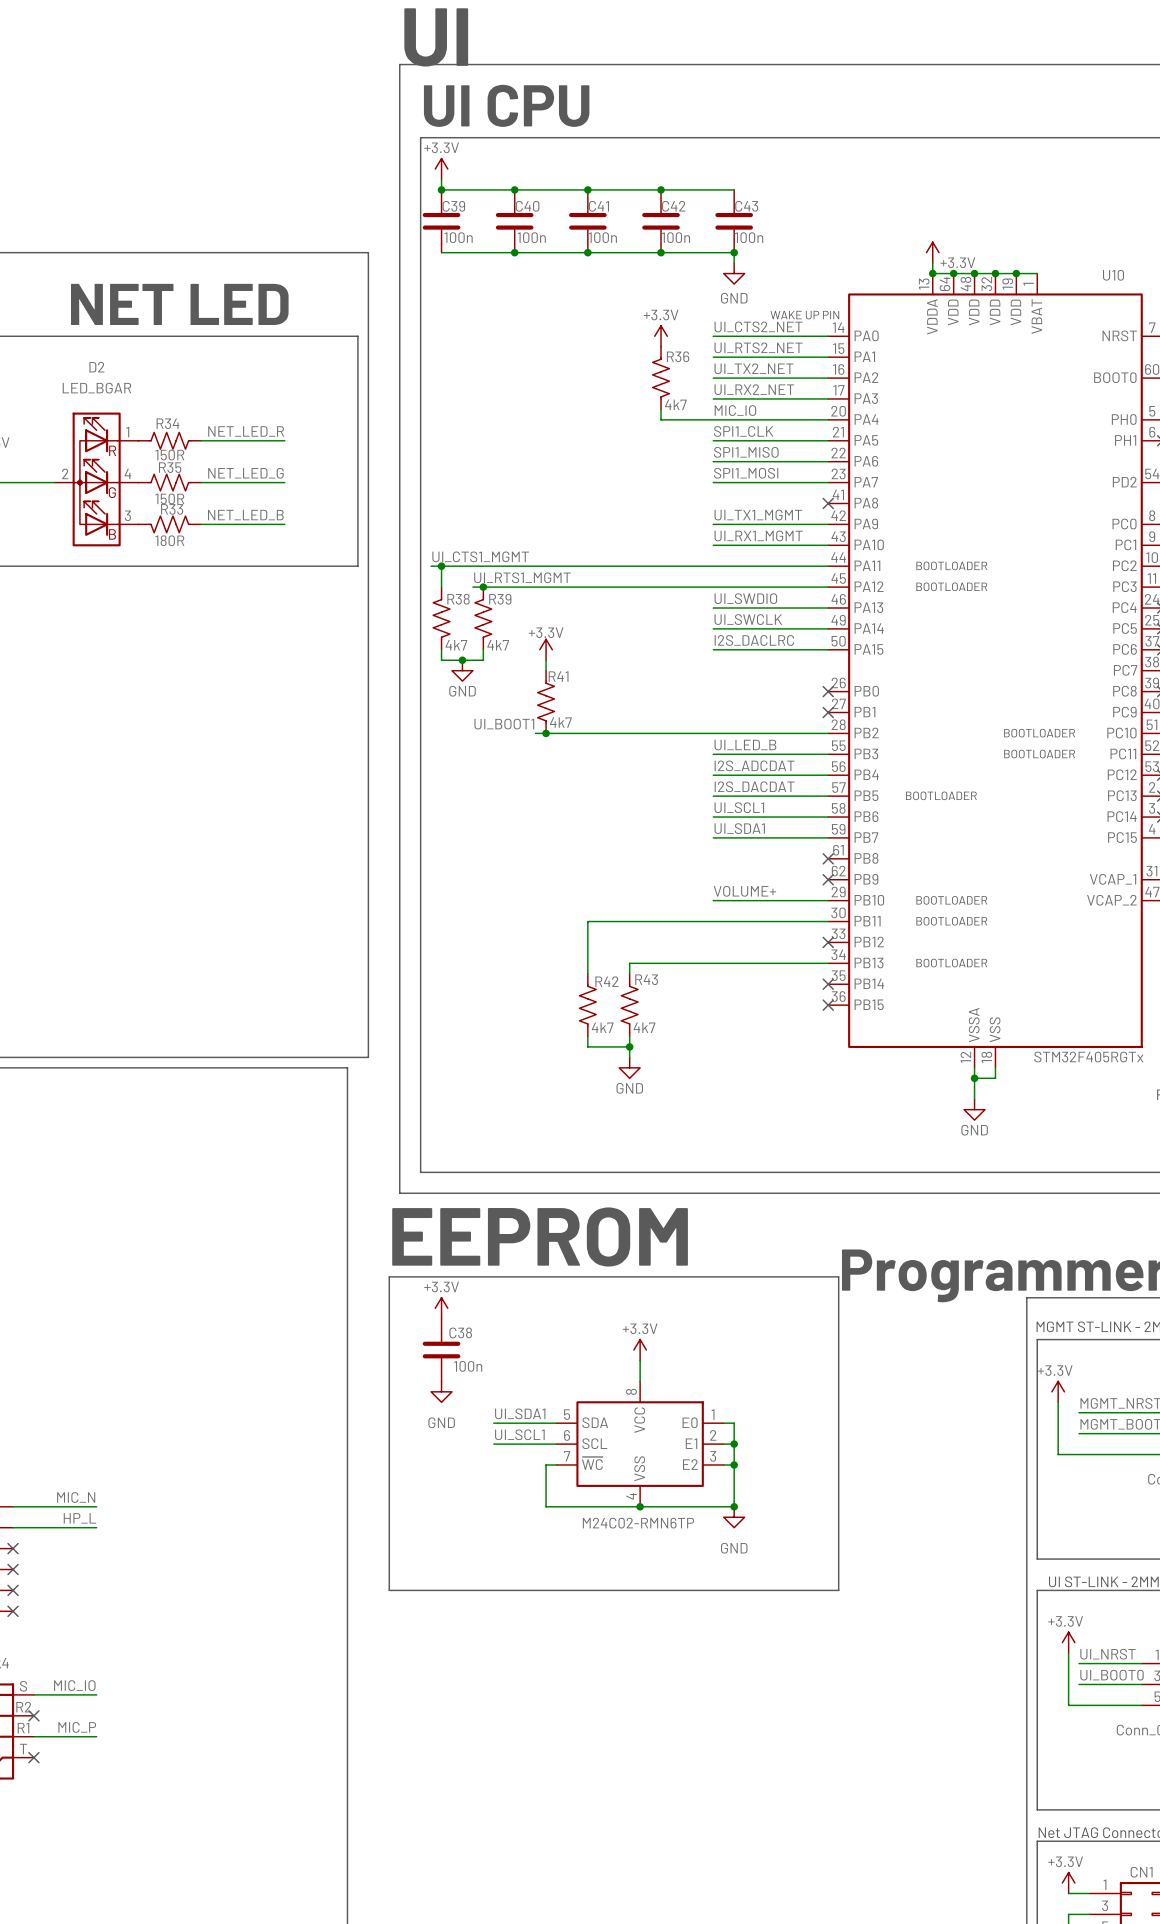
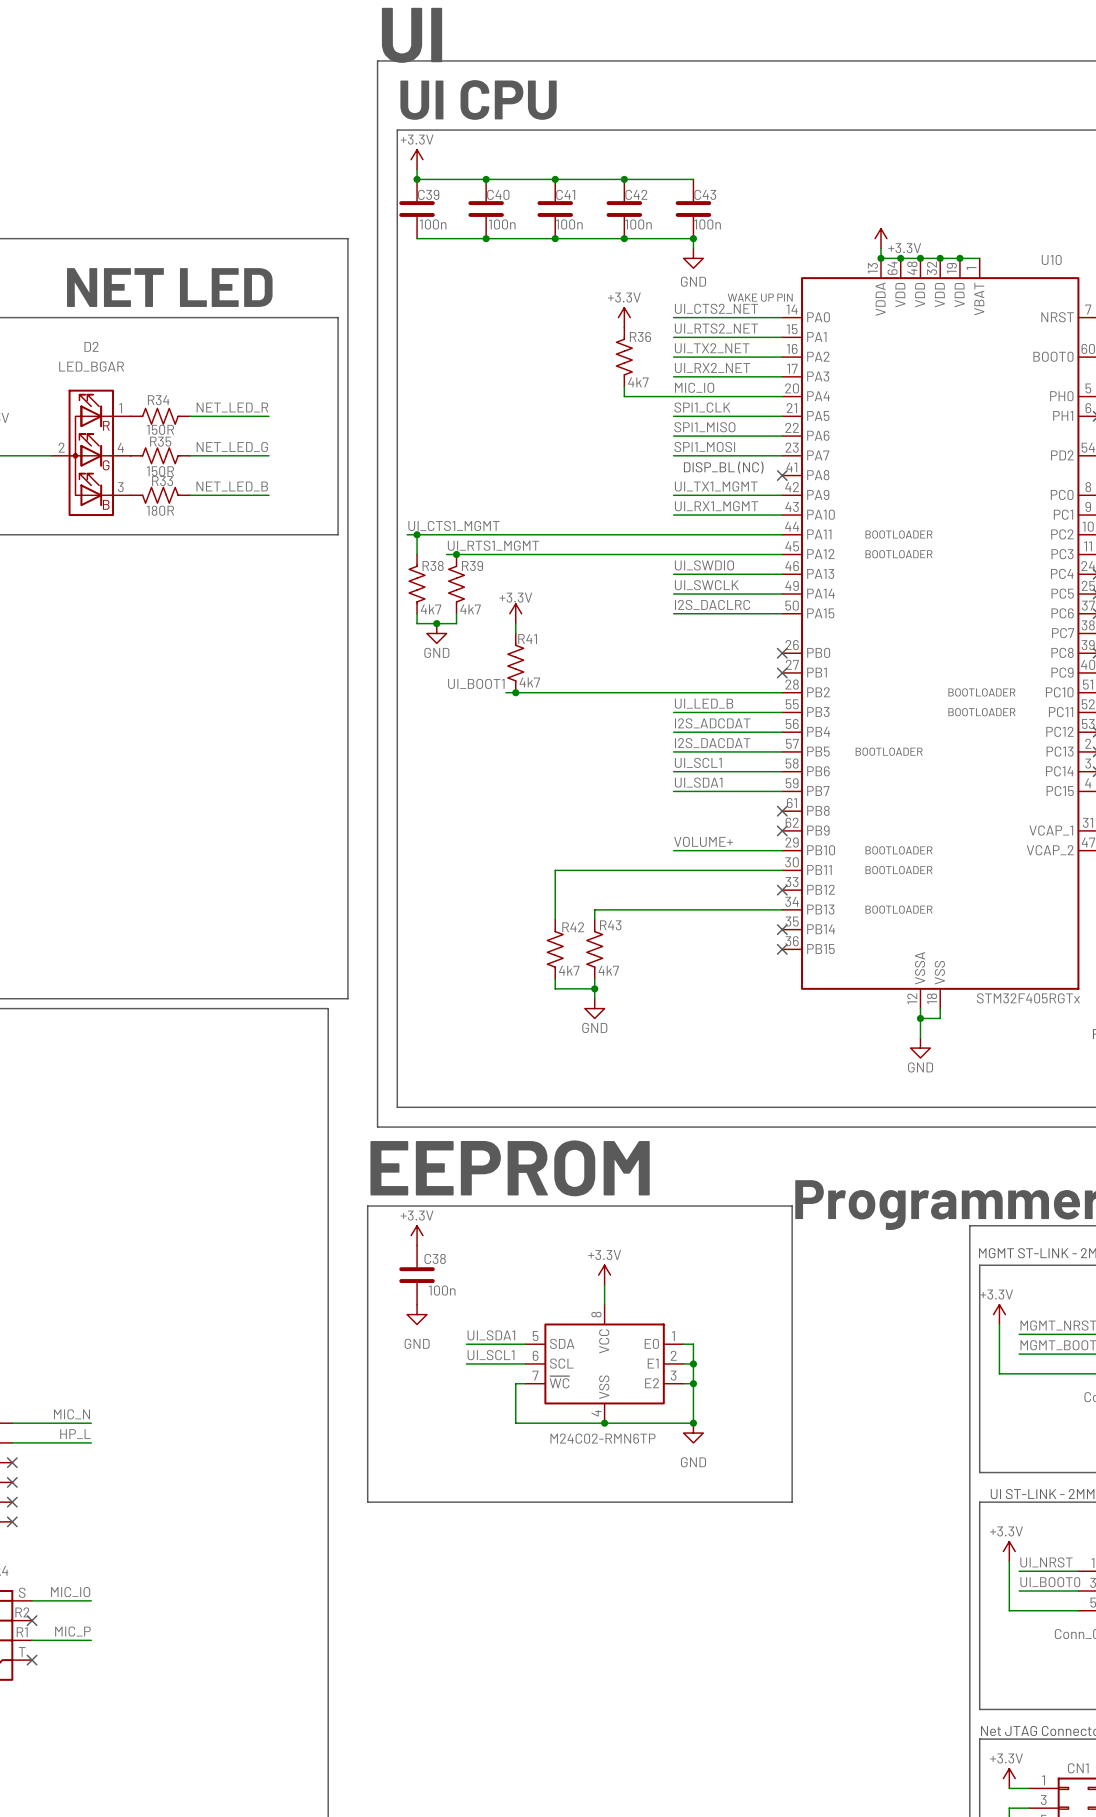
text: none -> DISP_BL (NC) (723, 467)

